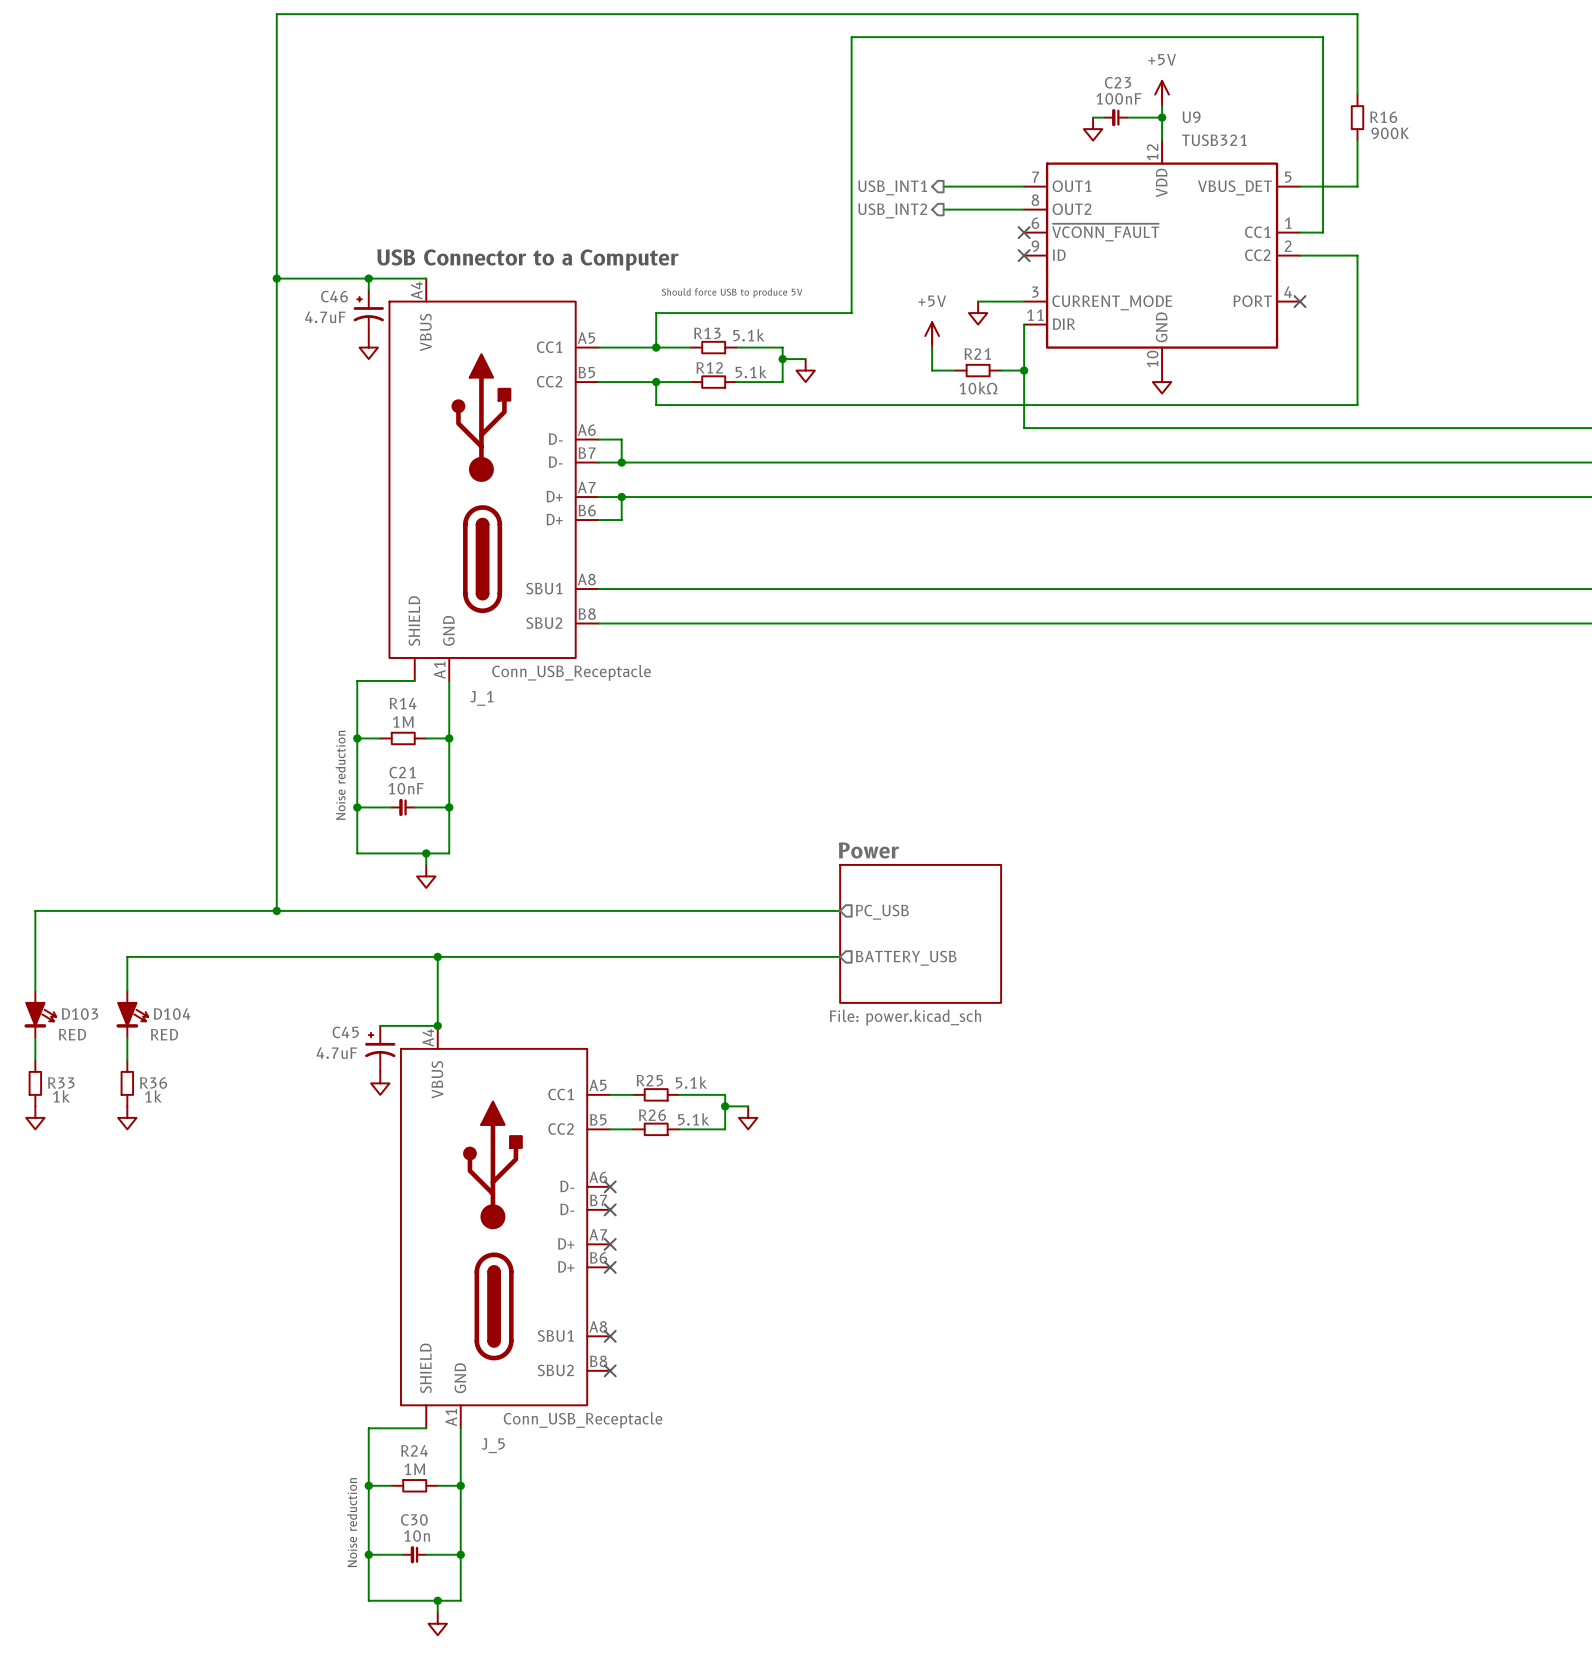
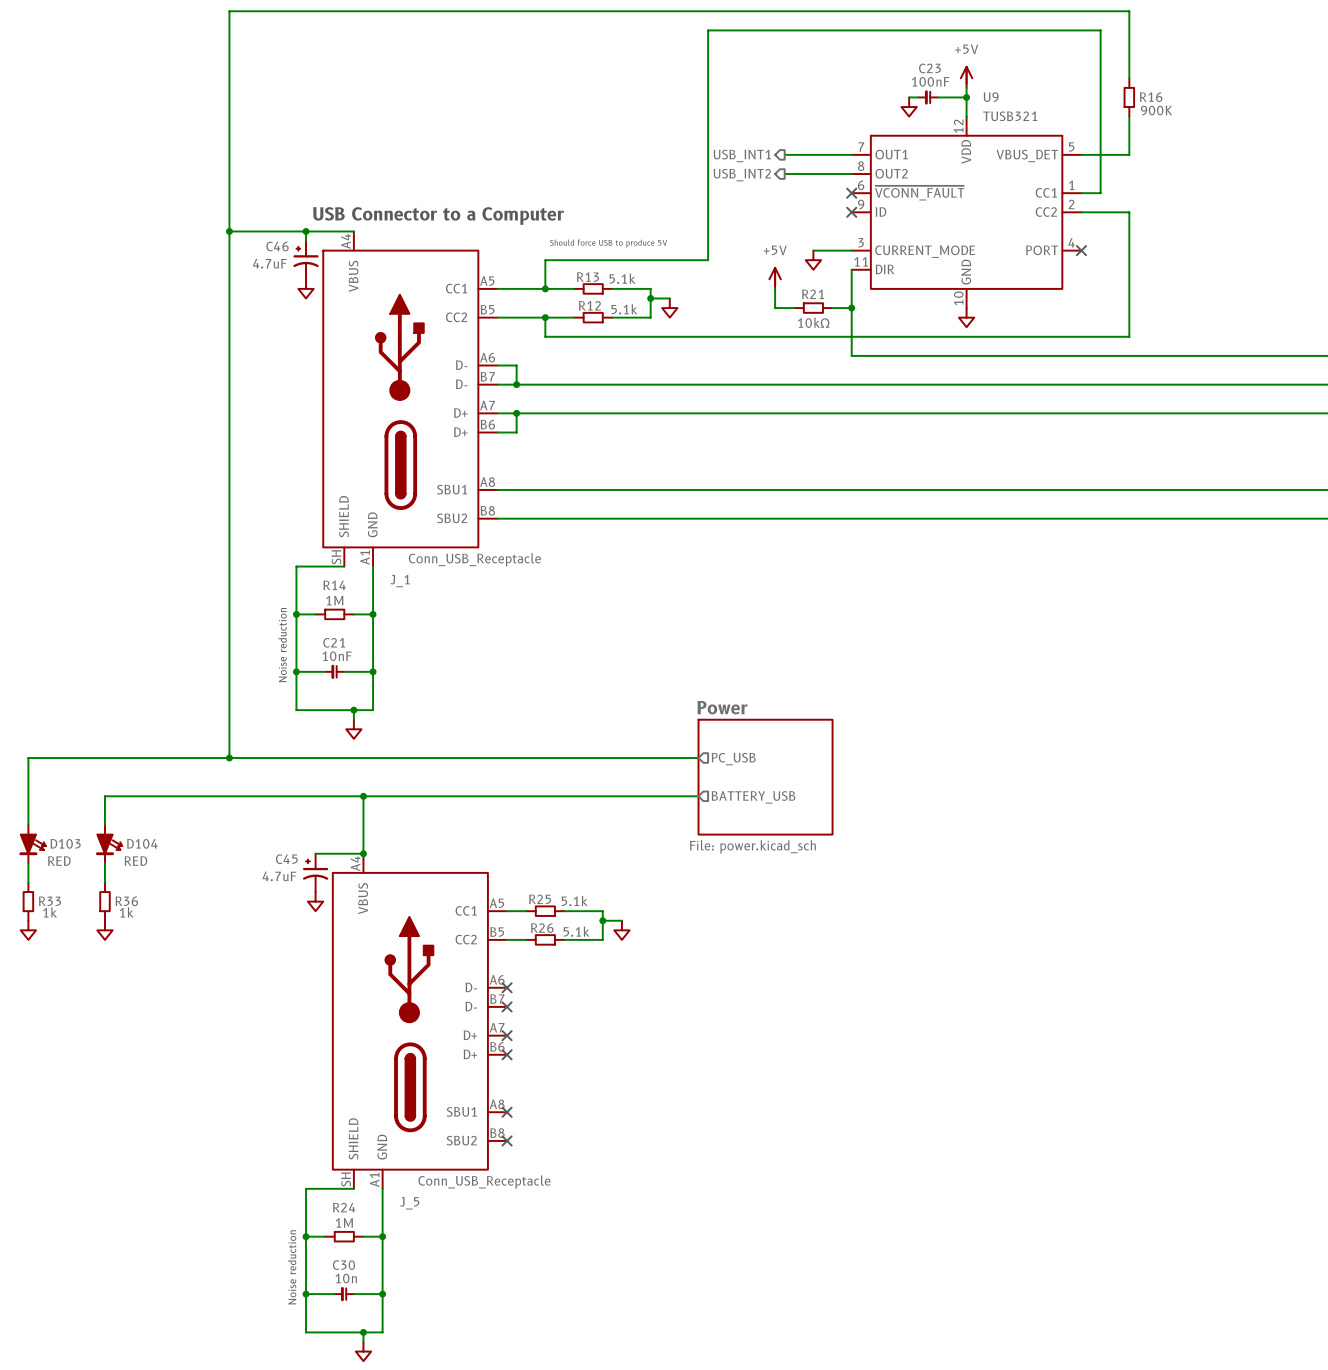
J_1 pin number: none -> SH (336, 557)
J_5 pin number: none -> SH (346, 1179)

